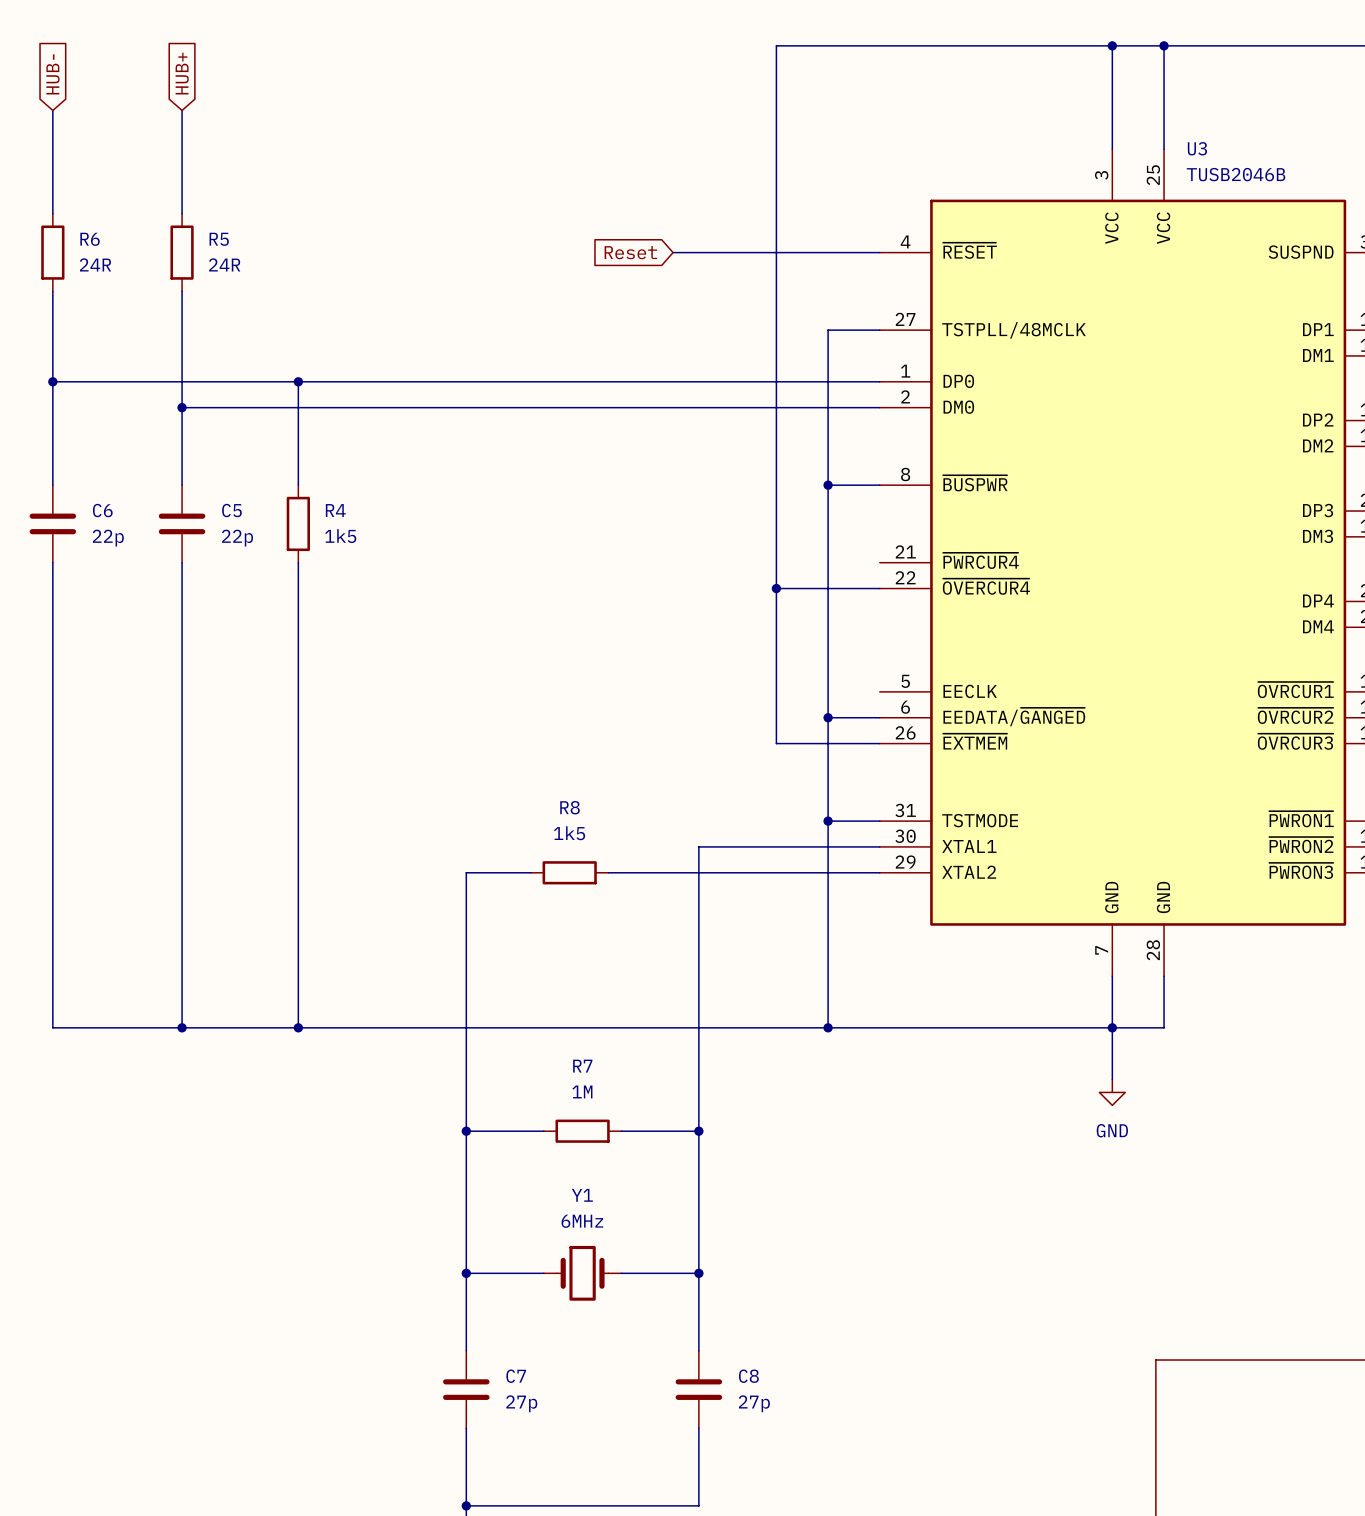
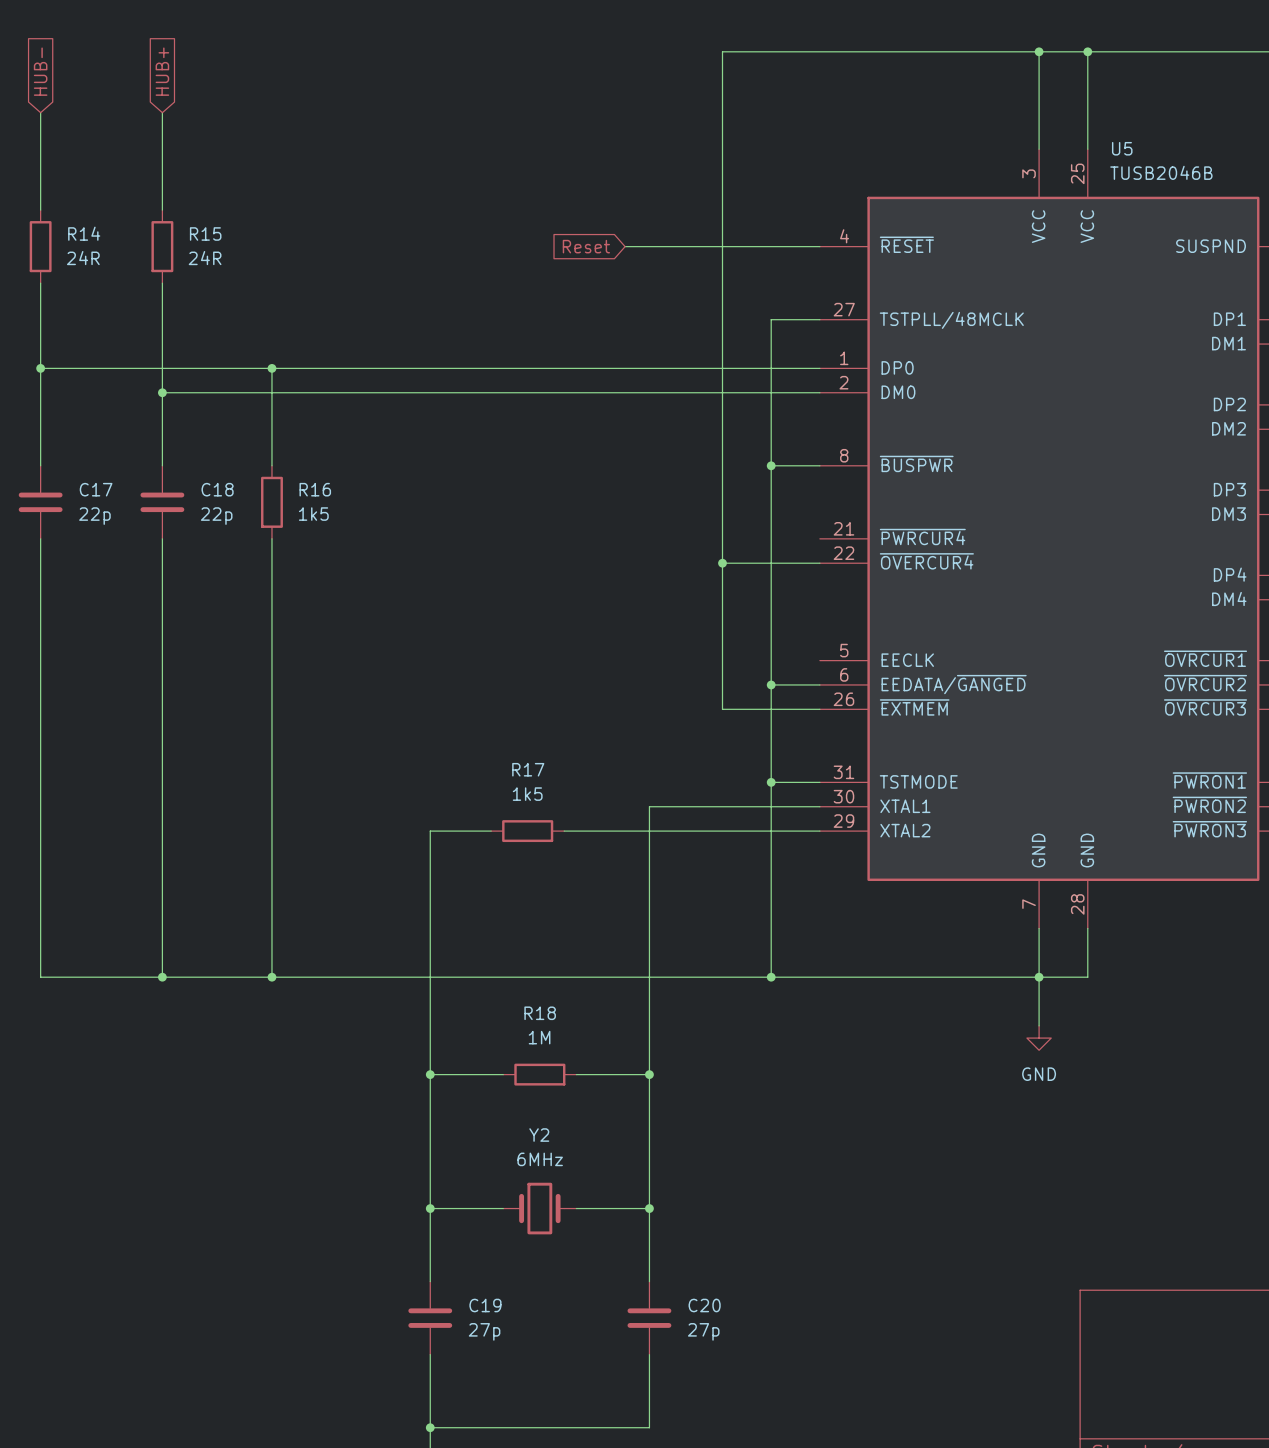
U3 name: U3 (1197, 148) -> U5 (1122, 148)
R6 name: R6 (90, 239) -> R14 (84, 233)
R5 name: R5 (219, 239) -> R15 (205, 234)
C6 name: C6 (102, 510) -> C17 (96, 489)
C5 name: C5 (231, 510) -> C18 (217, 489)
R4 name: R4 (335, 510) -> R16 (315, 489)
R8 name: R8 (570, 807) -> R17 (528, 769)
R7 name: R7 (582, 1066) -> R18 (540, 1013)
Y1 name: Y1 (582, 1195) -> Y2 (539, 1135)
C7 name: C7 (516, 1376) -> C19 (485, 1305)
C8 name: C8 (748, 1376) -> C20 (704, 1305)

